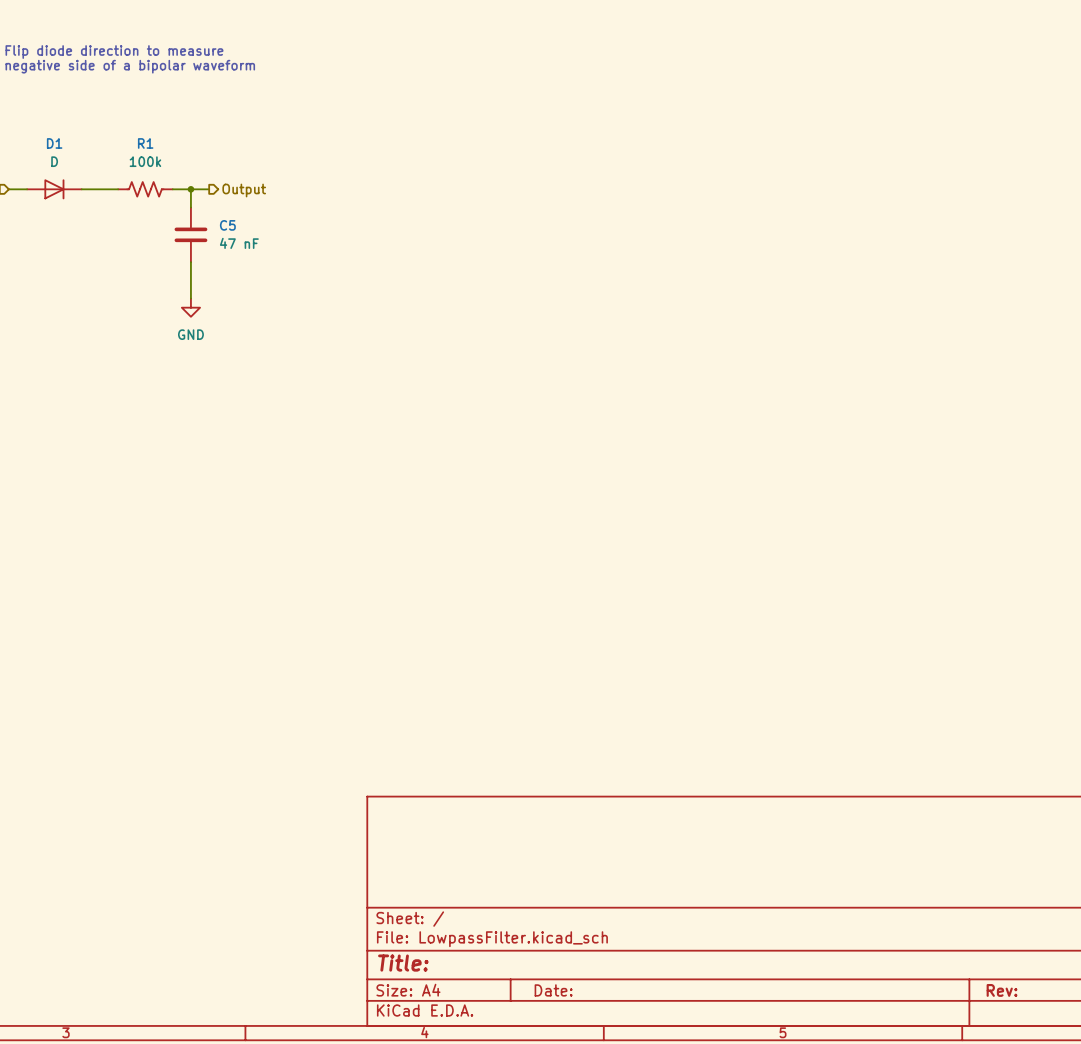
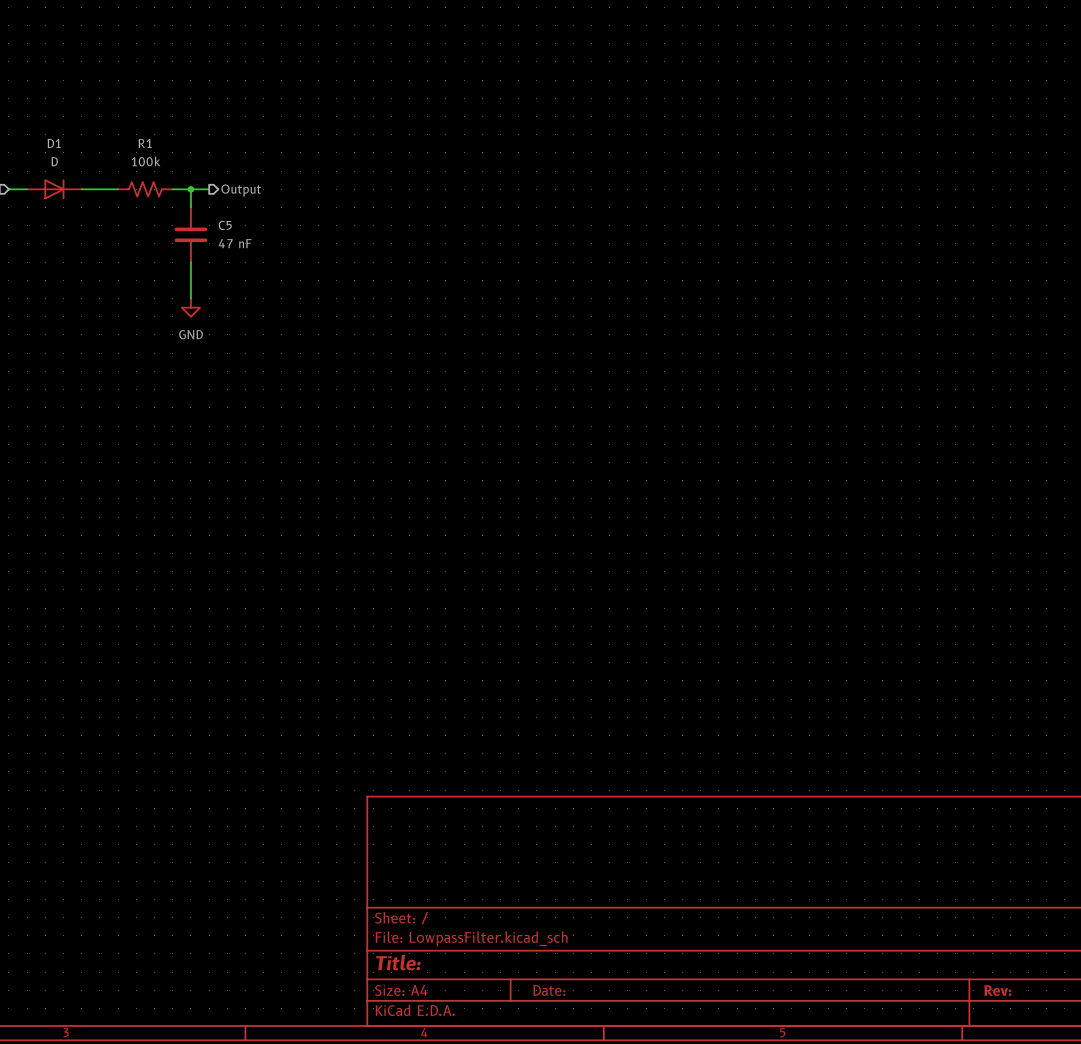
text: Flip diode direction to measure (114, 52) -> none
text: negative side of a bipolar waveform (130, 66) -> none

